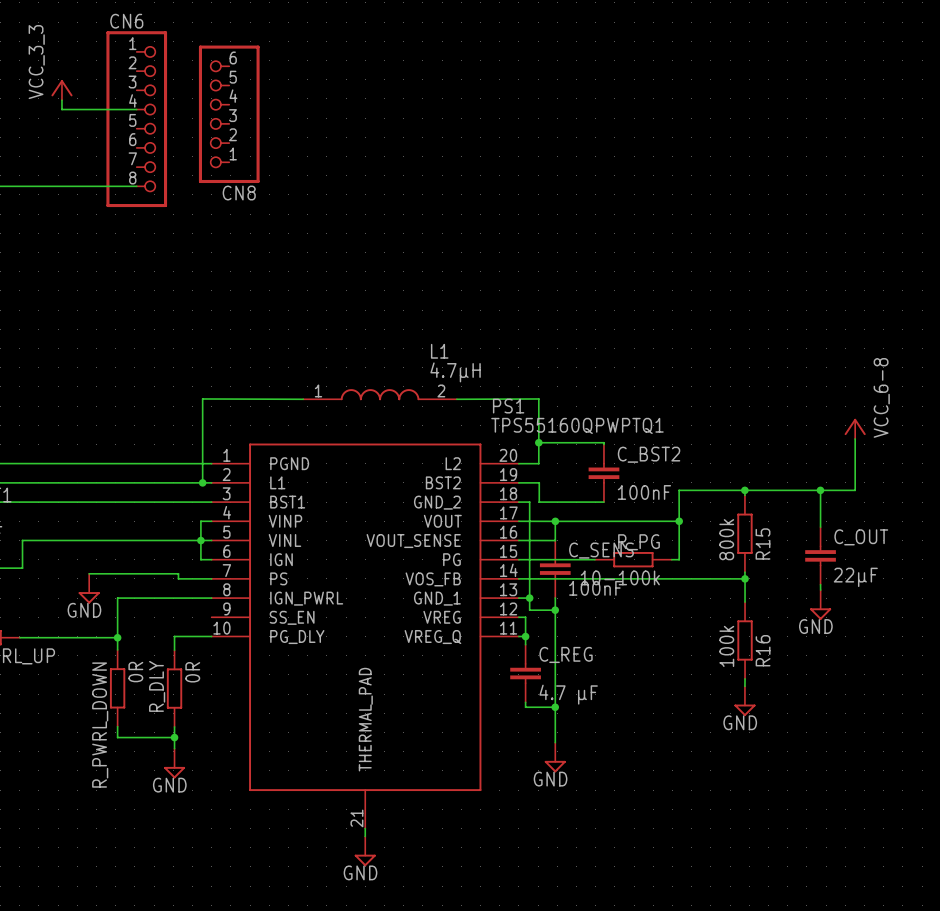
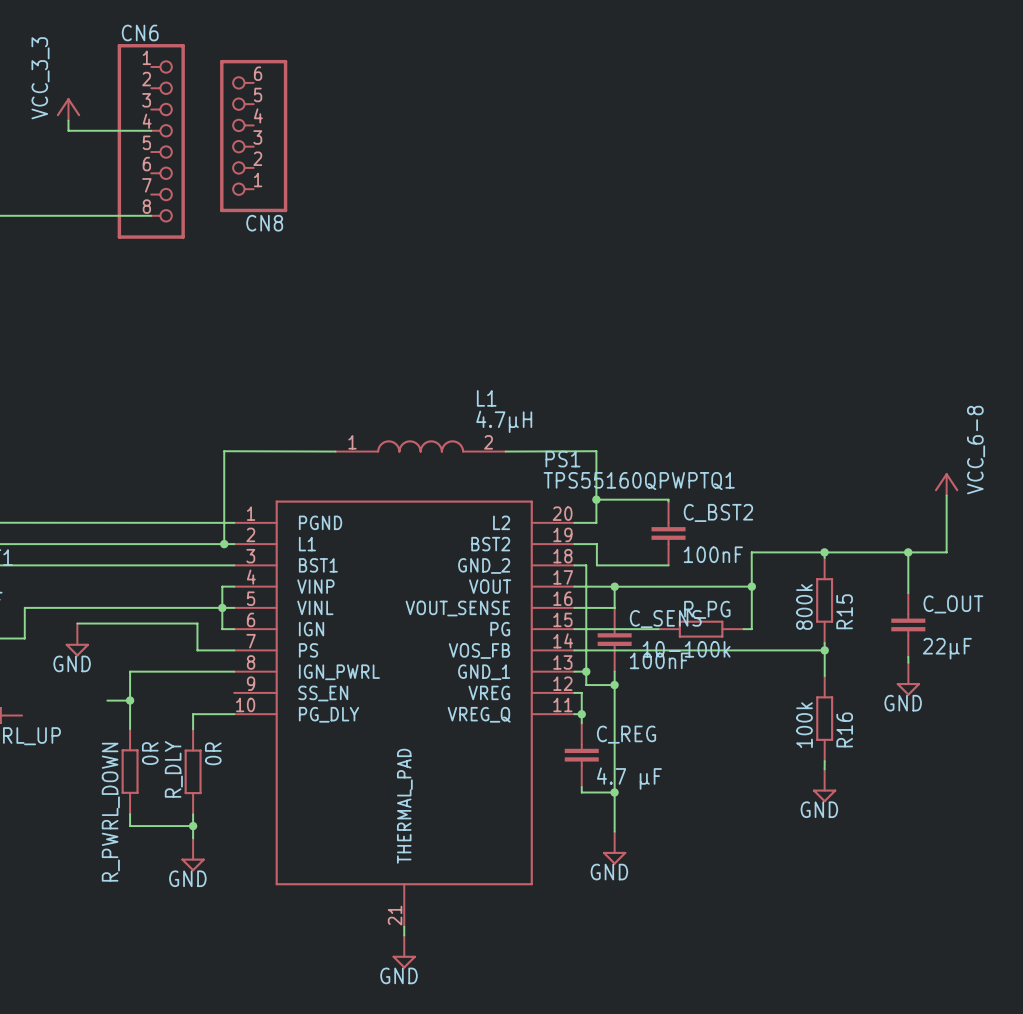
wire: (89, 573) (178, 573) -> (77, 623) (197, 623) (197, 644)
power symbol position: GND (89, 588) -> GND (77, 640)
wire: none -> (107, 700) (130, 700)
wire: (20, 637) (117, 637) -> none
junction position: (117, 637) -> (130, 700)

